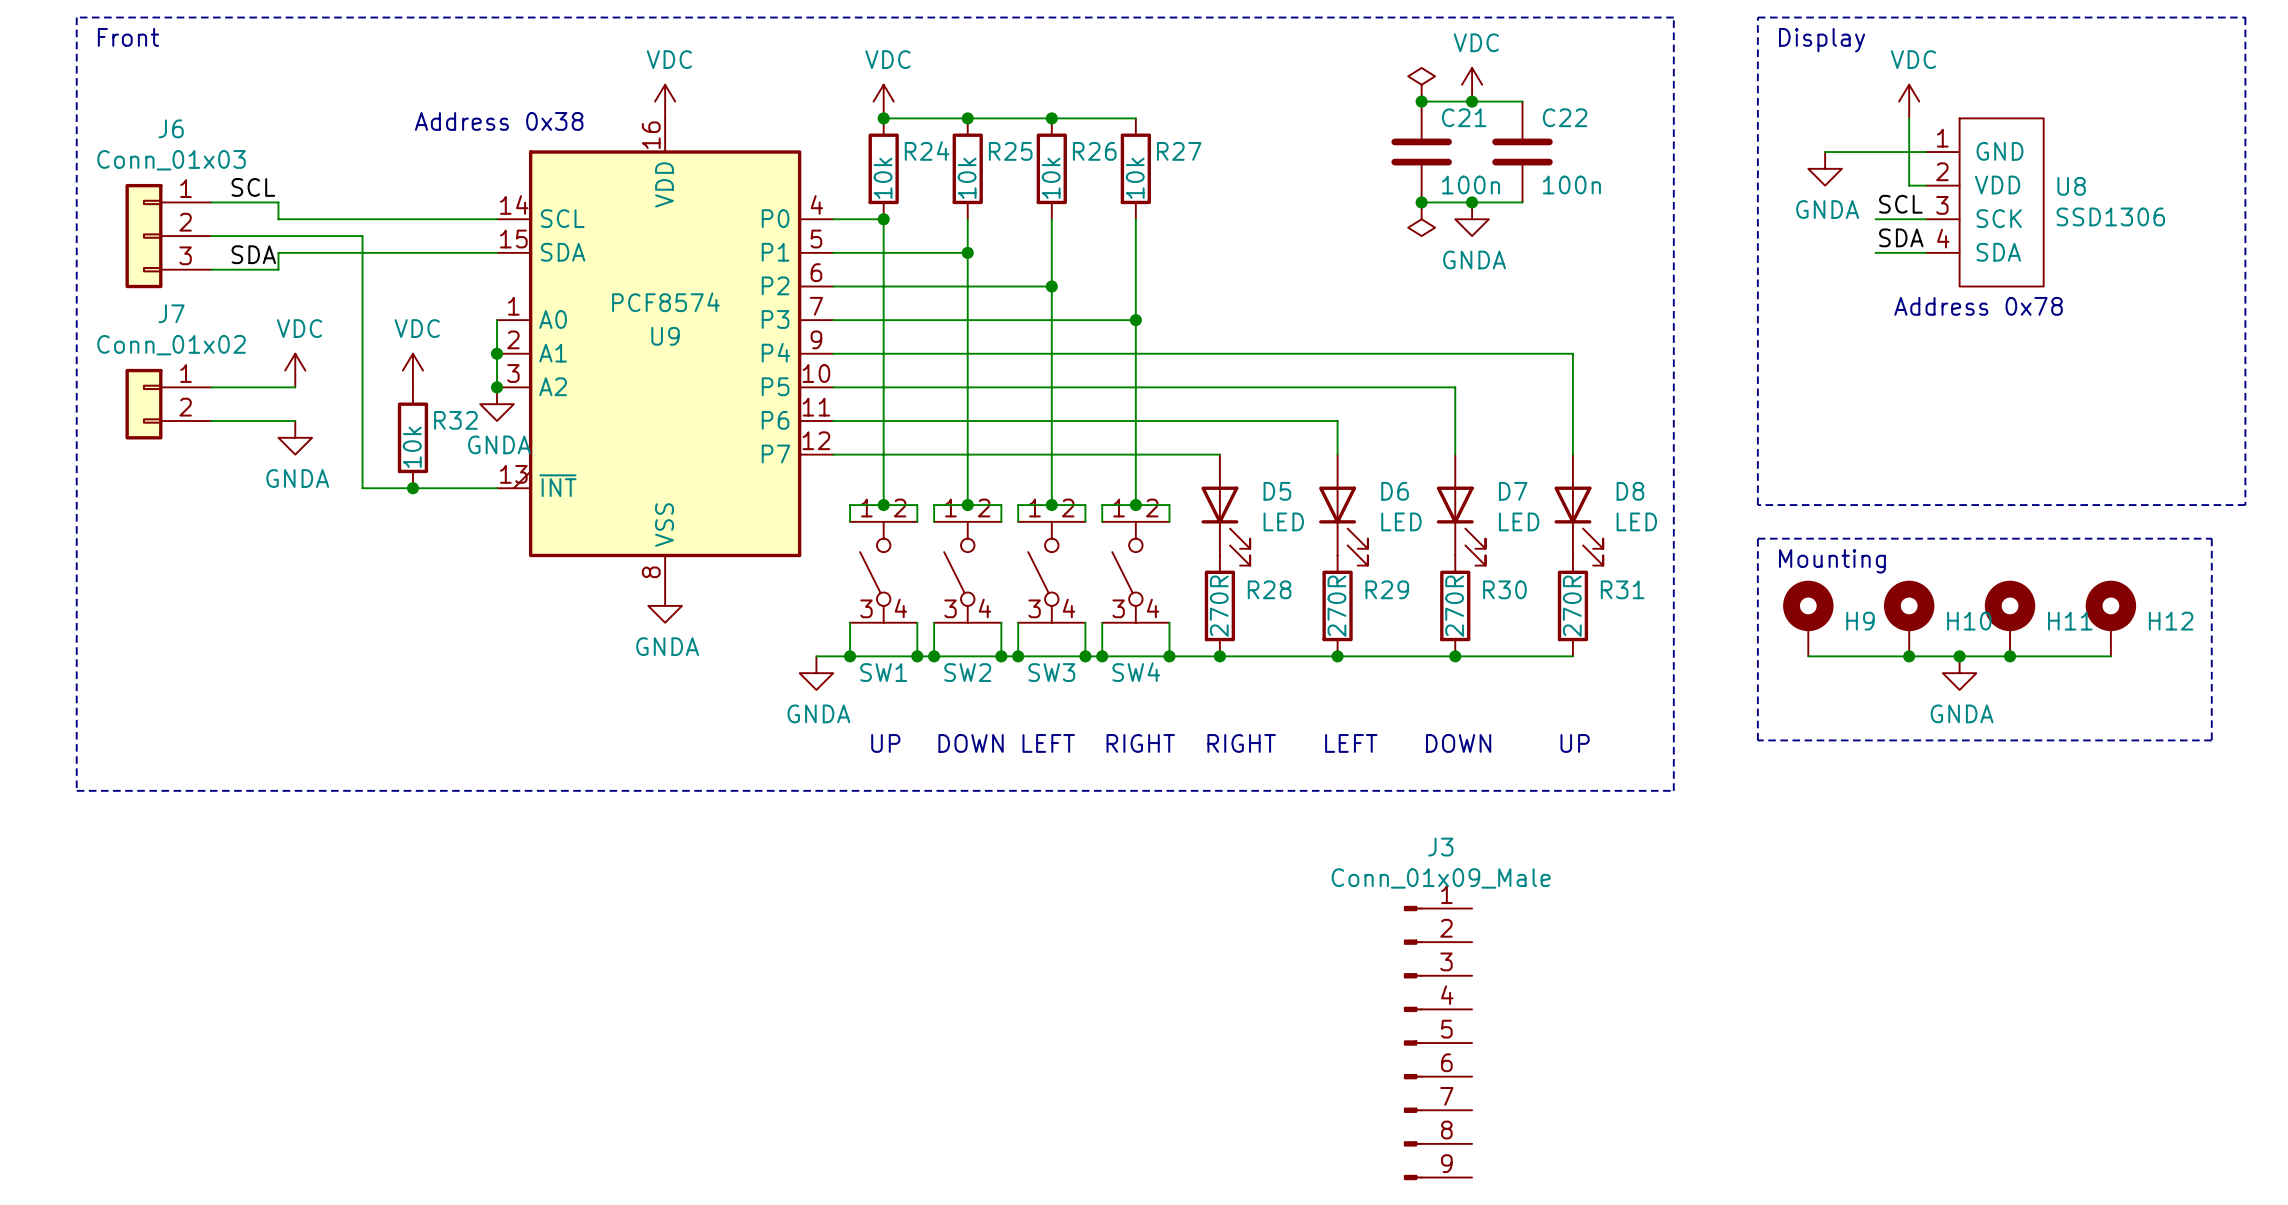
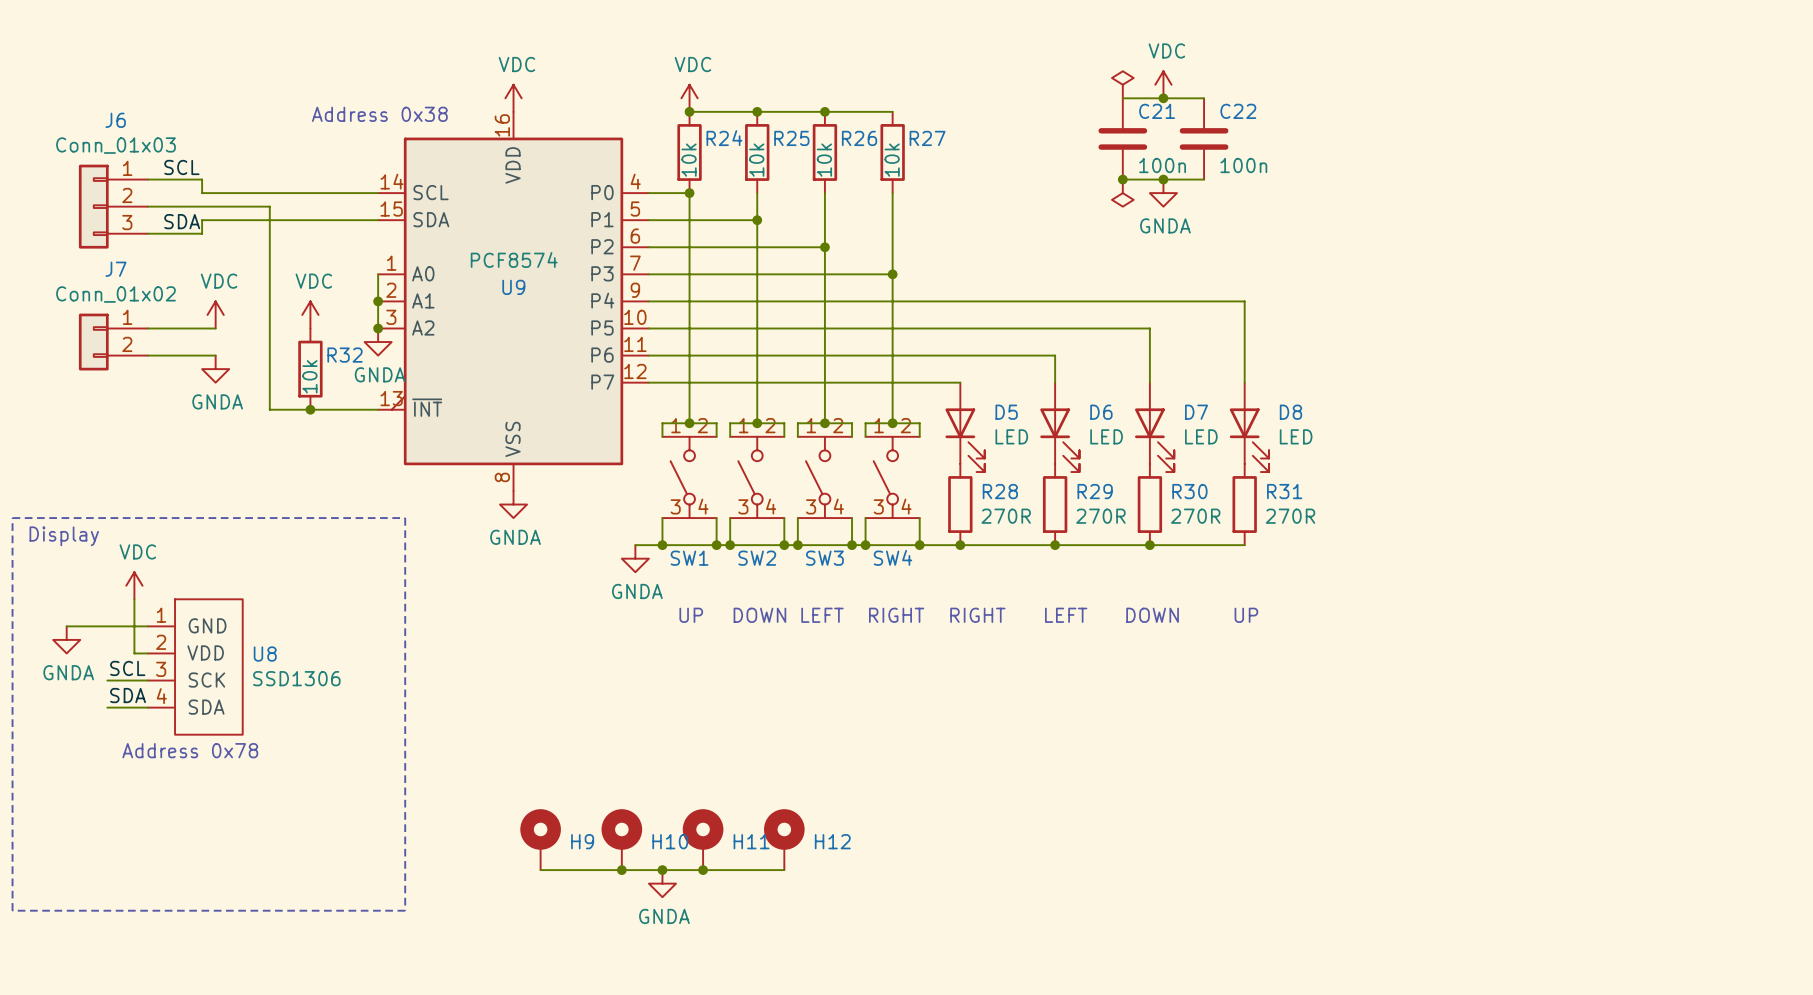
line: (76, 17) (1673, 17) (1673, 790) (76, 790) (76, 17) -> none
line: (1757, 17) (2245, 17) (2245, 505) (1757, 505) (1757, 17) -> none
text: Front (128, 37) -> none
text: Display (1822, 40) -> none
junction: (1421, 101) -> none
power symbol: VDC (1909, 101) -> none
wire: (1909, 118) (1909, 185) (1925, 185) -> none
wire: (1825, 152) (1925, 152) -> none
power symbol: GNDA (1825, 168) -> none
U8 position: (1984, 202) -> (195, 666)
label: SCL (1900, 204) -> none
wire: (1875, 219) (1925, 219) -> none
label: SDA (1901, 237) -> none
wire: (1875, 252) (1925, 252) -> none
text: Address 0x78 (1978, 306) -> none
line: (1757, 538) (1757, 740) (2211, 740) (2211, 538) (1757, 538) -> none
text: Mounting (1832, 561) -> none
R28 value rotation: 0° (1219, 606) -> 90° clockwise (1006, 516)
R29 value rotation: 0° (1336, 606) -> 90° clockwise (1100, 516)
R30 value rotation: 0° (1454, 606) -> 90° clockwise (1195, 516)
R31 value rotation: 0° (1572, 606) -> 90° clockwise (1290, 516)
H9 position: (1808, 618) -> (540, 839)
H10 position: (1909, 618) -> (621, 839)
H11 position: (2010, 618) -> (703, 839)
H12 position: (2110, 618) -> (784, 839)
line: none -> (12, 518) (405, 518) (405, 910) (12, 910) (12, 518)
text: none -> Display (64, 536)
wire: (1808, 656) (2110, 656) -> none
junction: (1909, 656) -> none
junction: (1959, 656) -> none
junction: (2010, 656) -> none
power symbol: GNDA (1959, 673) -> none
power symbol: none -> VDC (134, 585)
wire: none -> (134, 599) (134, 653) (147, 653)
wire: none -> (66, 626) (147, 626)
power symbol: none -> GNDA (66, 639)
label: none -> SCL (127, 668)
wire: none -> (107, 680) (147, 680)
label: none -> SDA (128, 695)
wire: none -> (107, 707) (147, 707)
text: none -> Address 0x78 (190, 750)
J3: Conn_01x09_Male (1437, 1043) -> none
wire: none -> (540, 870) (784, 870)
junction: none -> (621, 870)
junction: none -> (662, 870)
junction: none -> (703, 870)
power symbol: none -> GNDA (662, 883)

